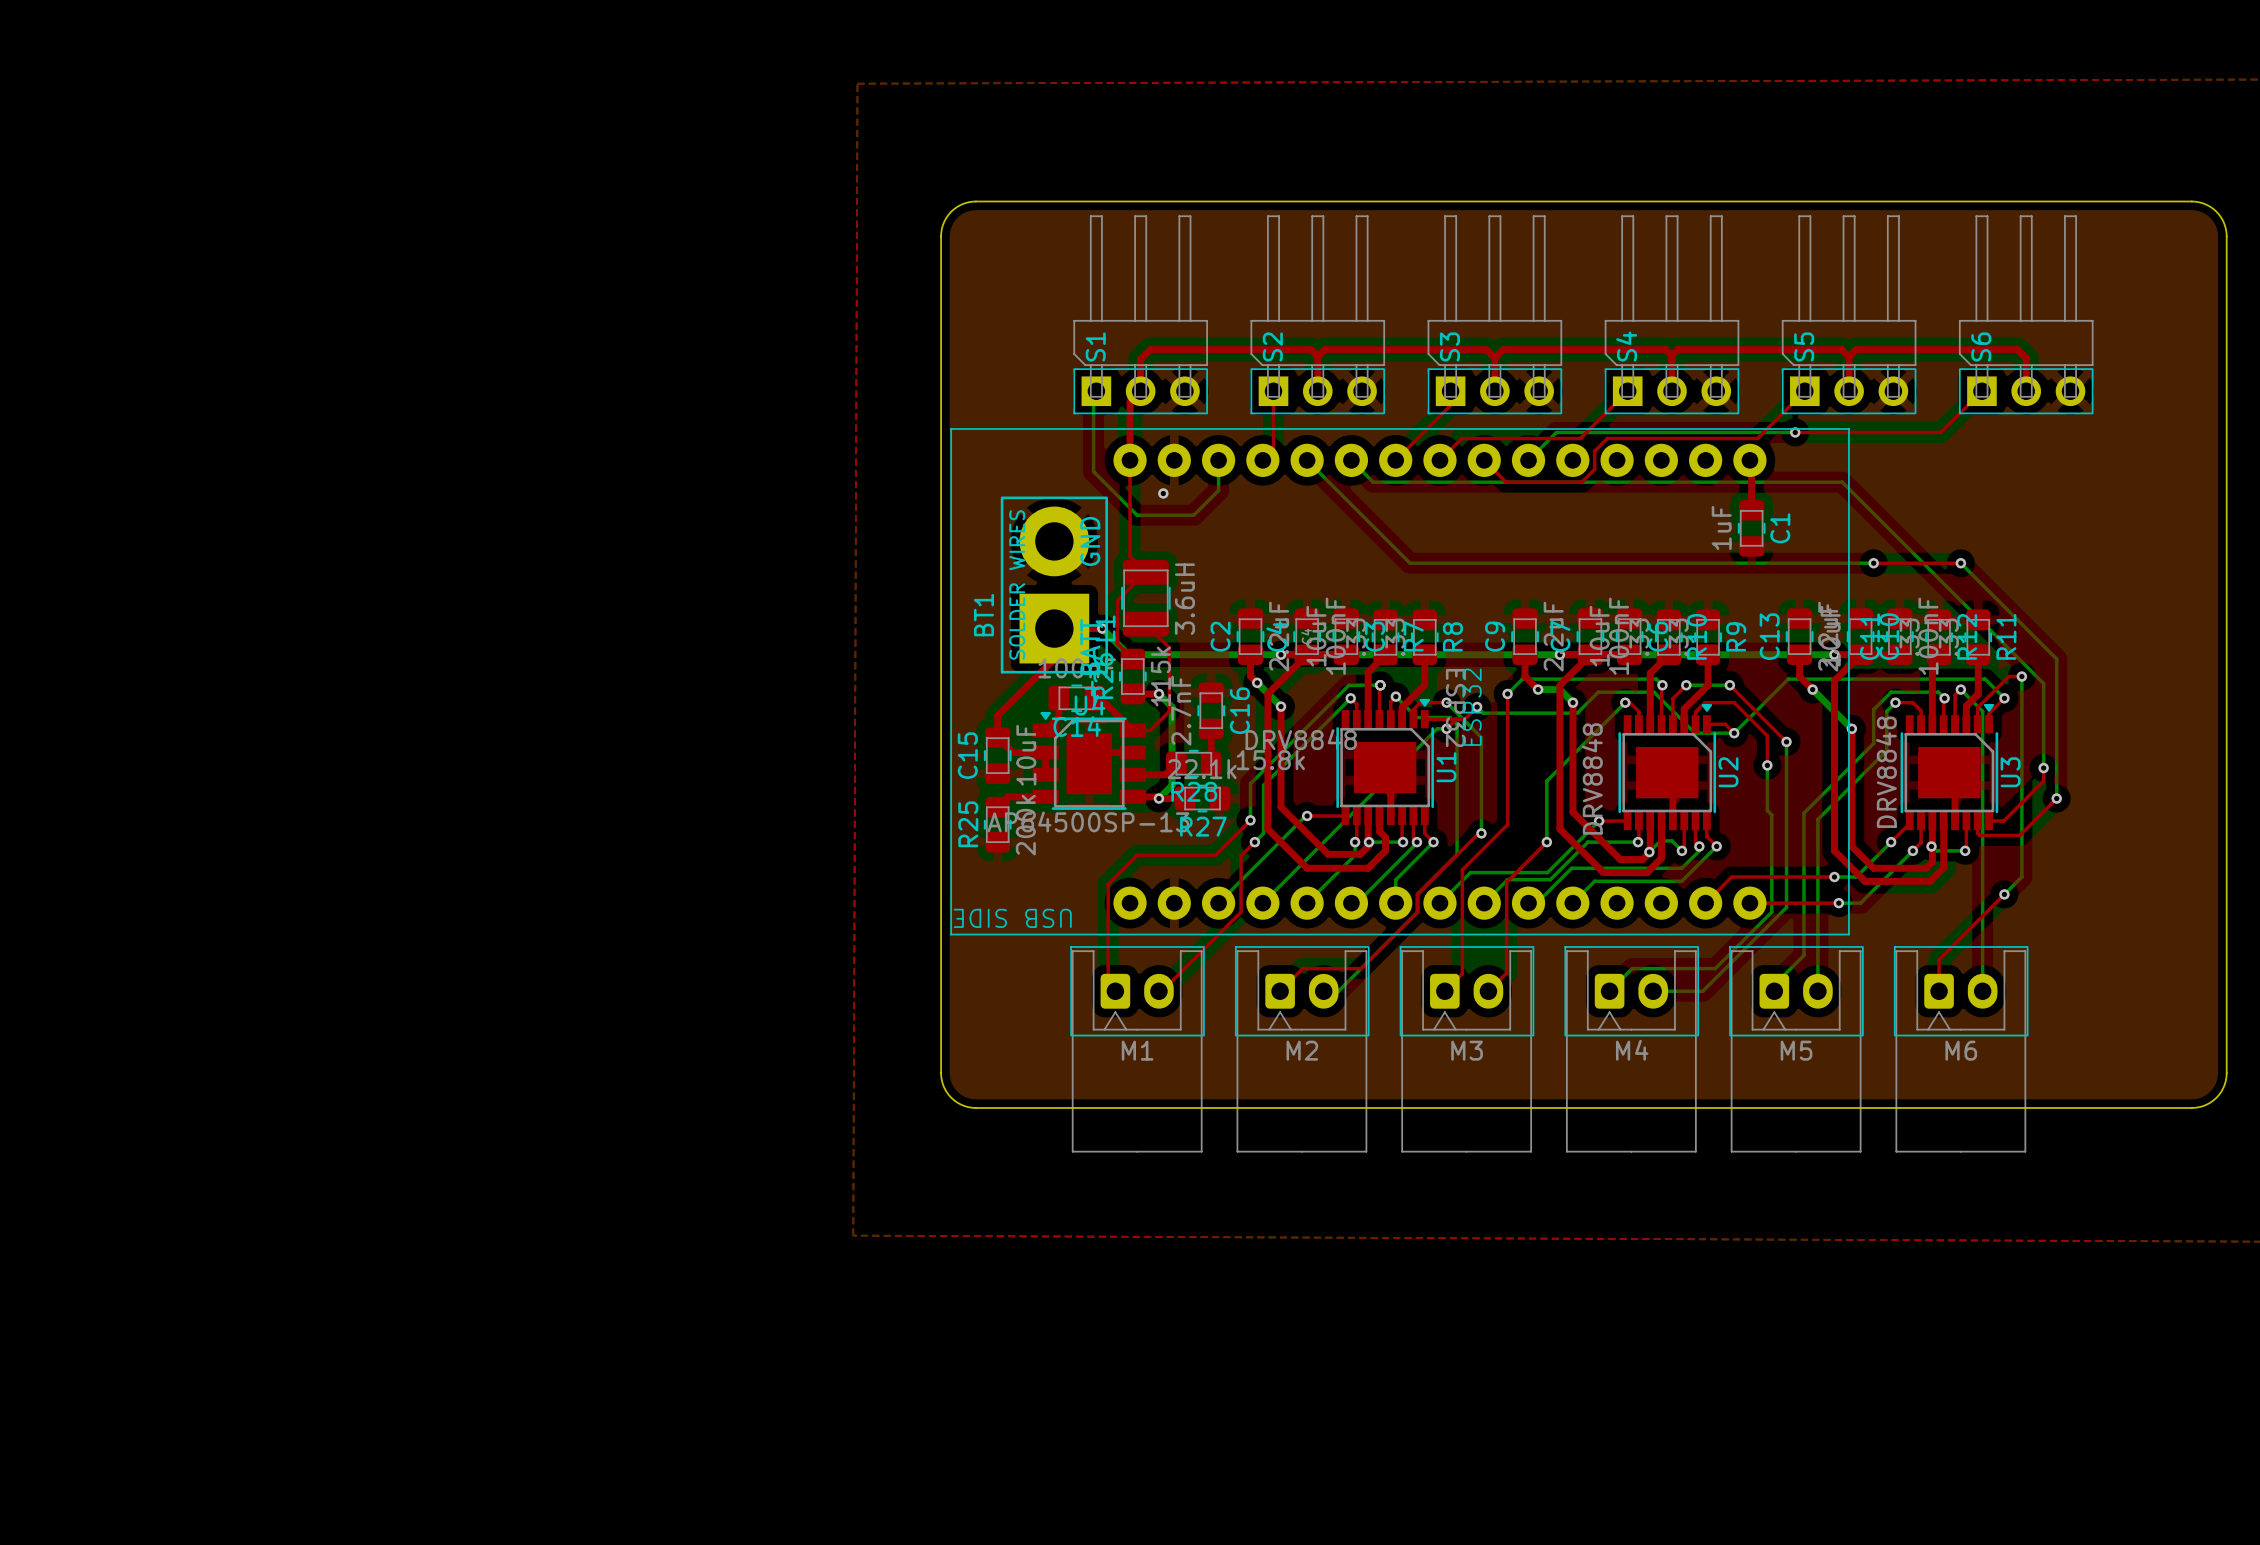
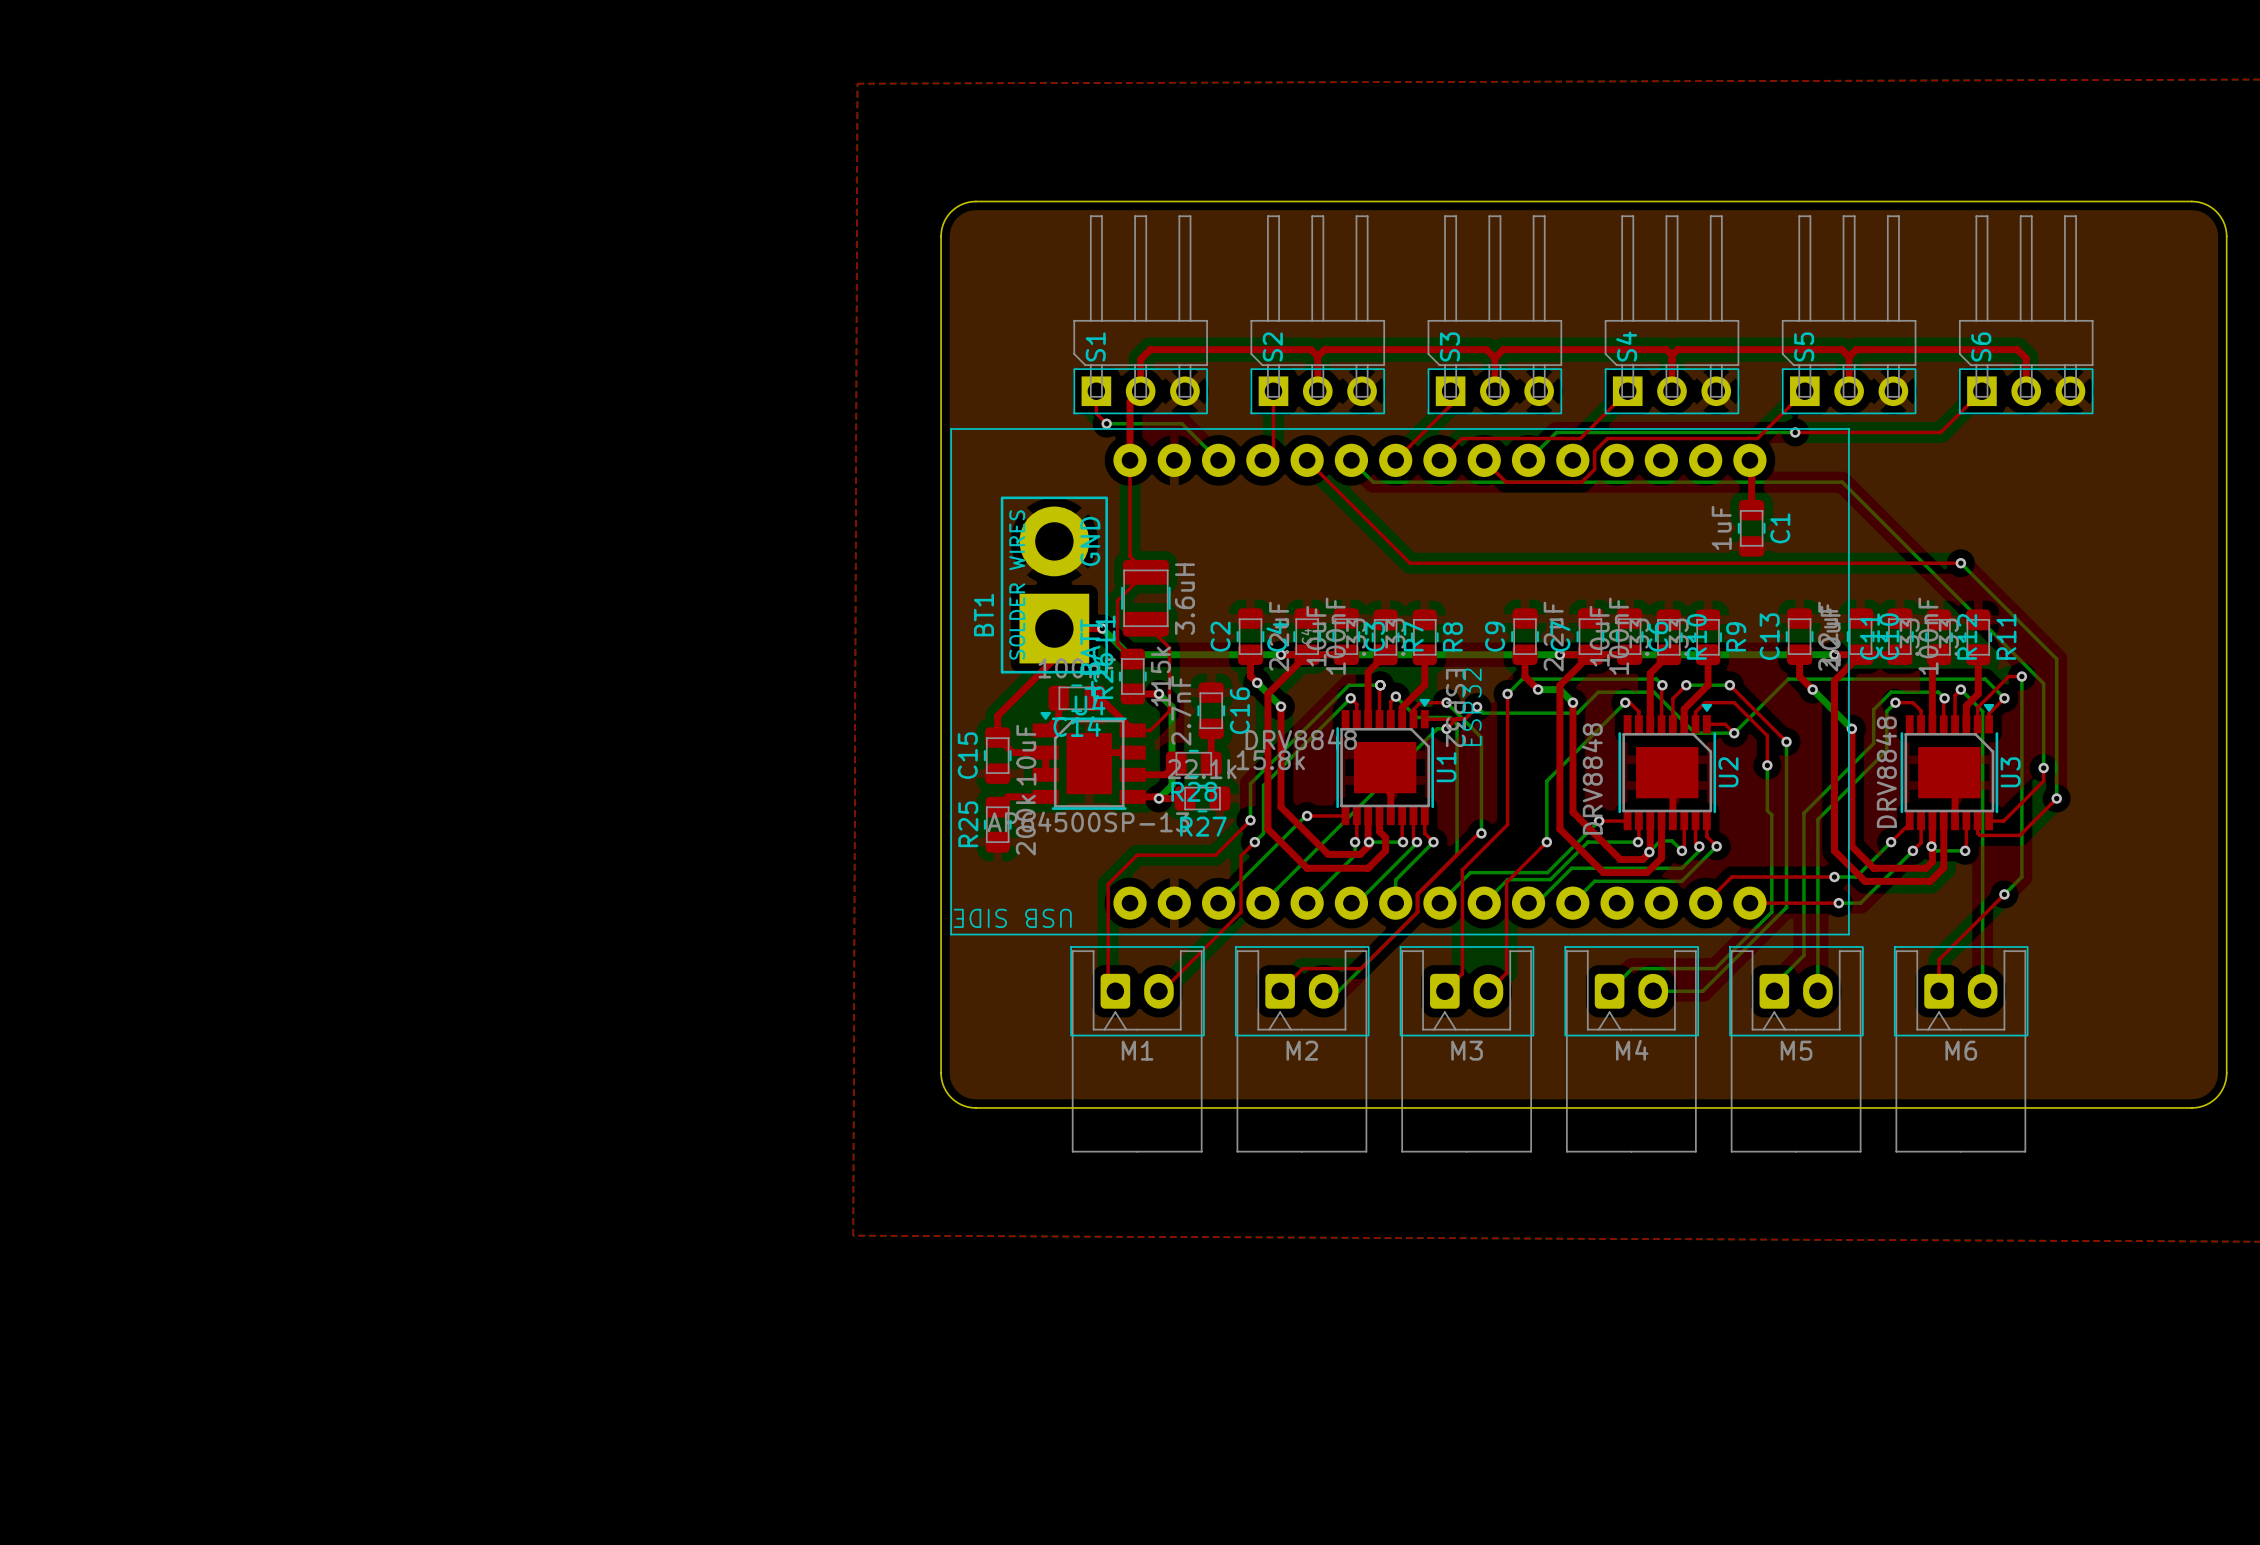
top track: none -> (1096, 391) (1096, 413) (1106, 423)
bottom track: (1096, 391) (1093, 394) (1093, 471) (1137, 515) (1193, 515) (1218, 490) (1218, 460) -> (1106, 423) (1181, 423) (1218, 460)
top track: none -> (1307, 460) (1409, 563) (1873, 563)
bottom track: (1307, 460) (1409, 563) (1873, 563) -> none
via position: (1163, 493) -> (1106, 423)
via: (1873, 563) -> none

